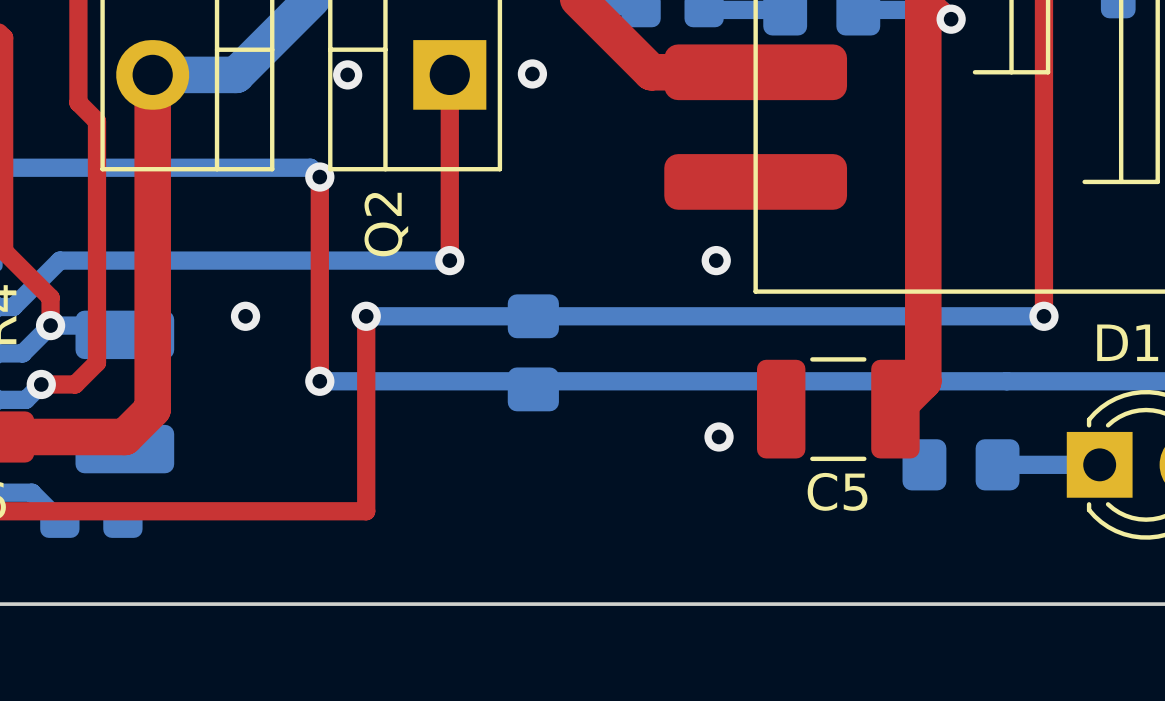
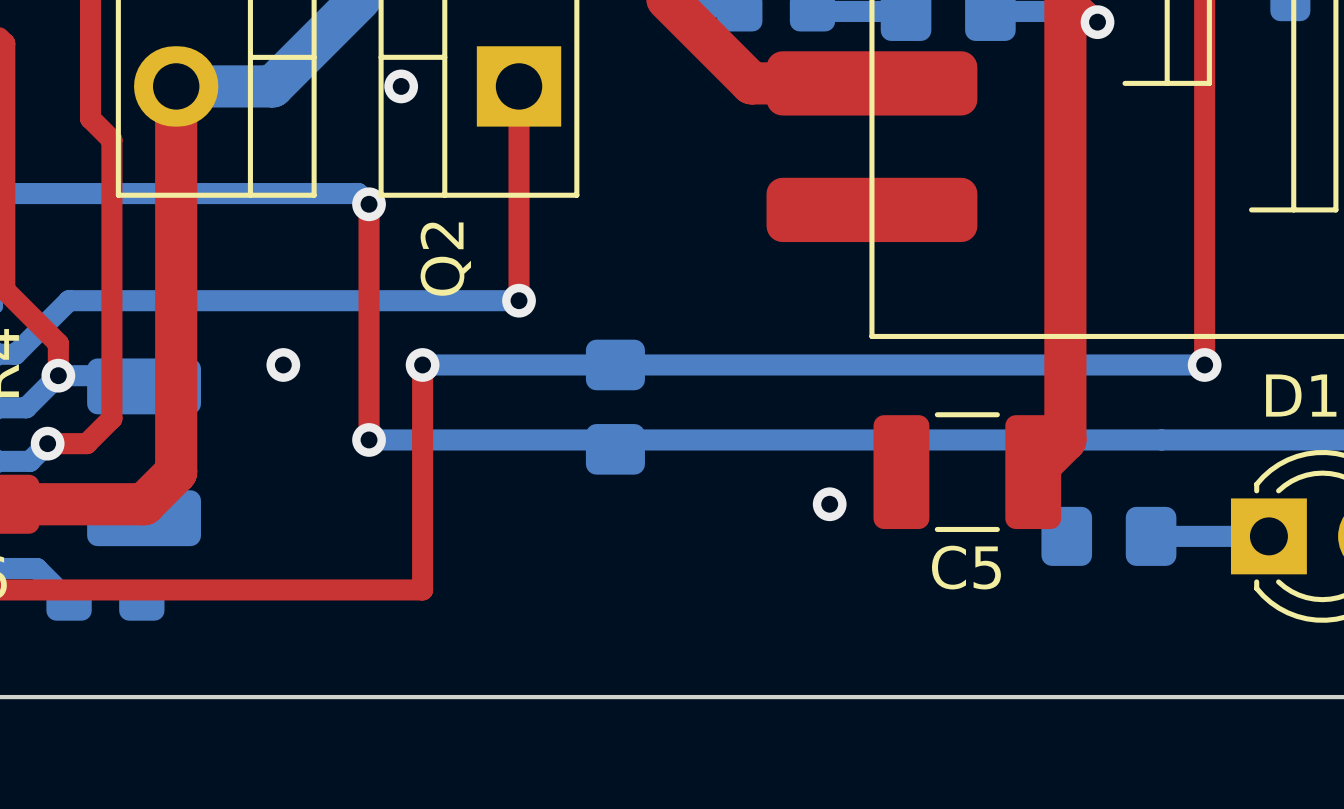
via: (532, 73) -> none
via: (716, 260) -> none

